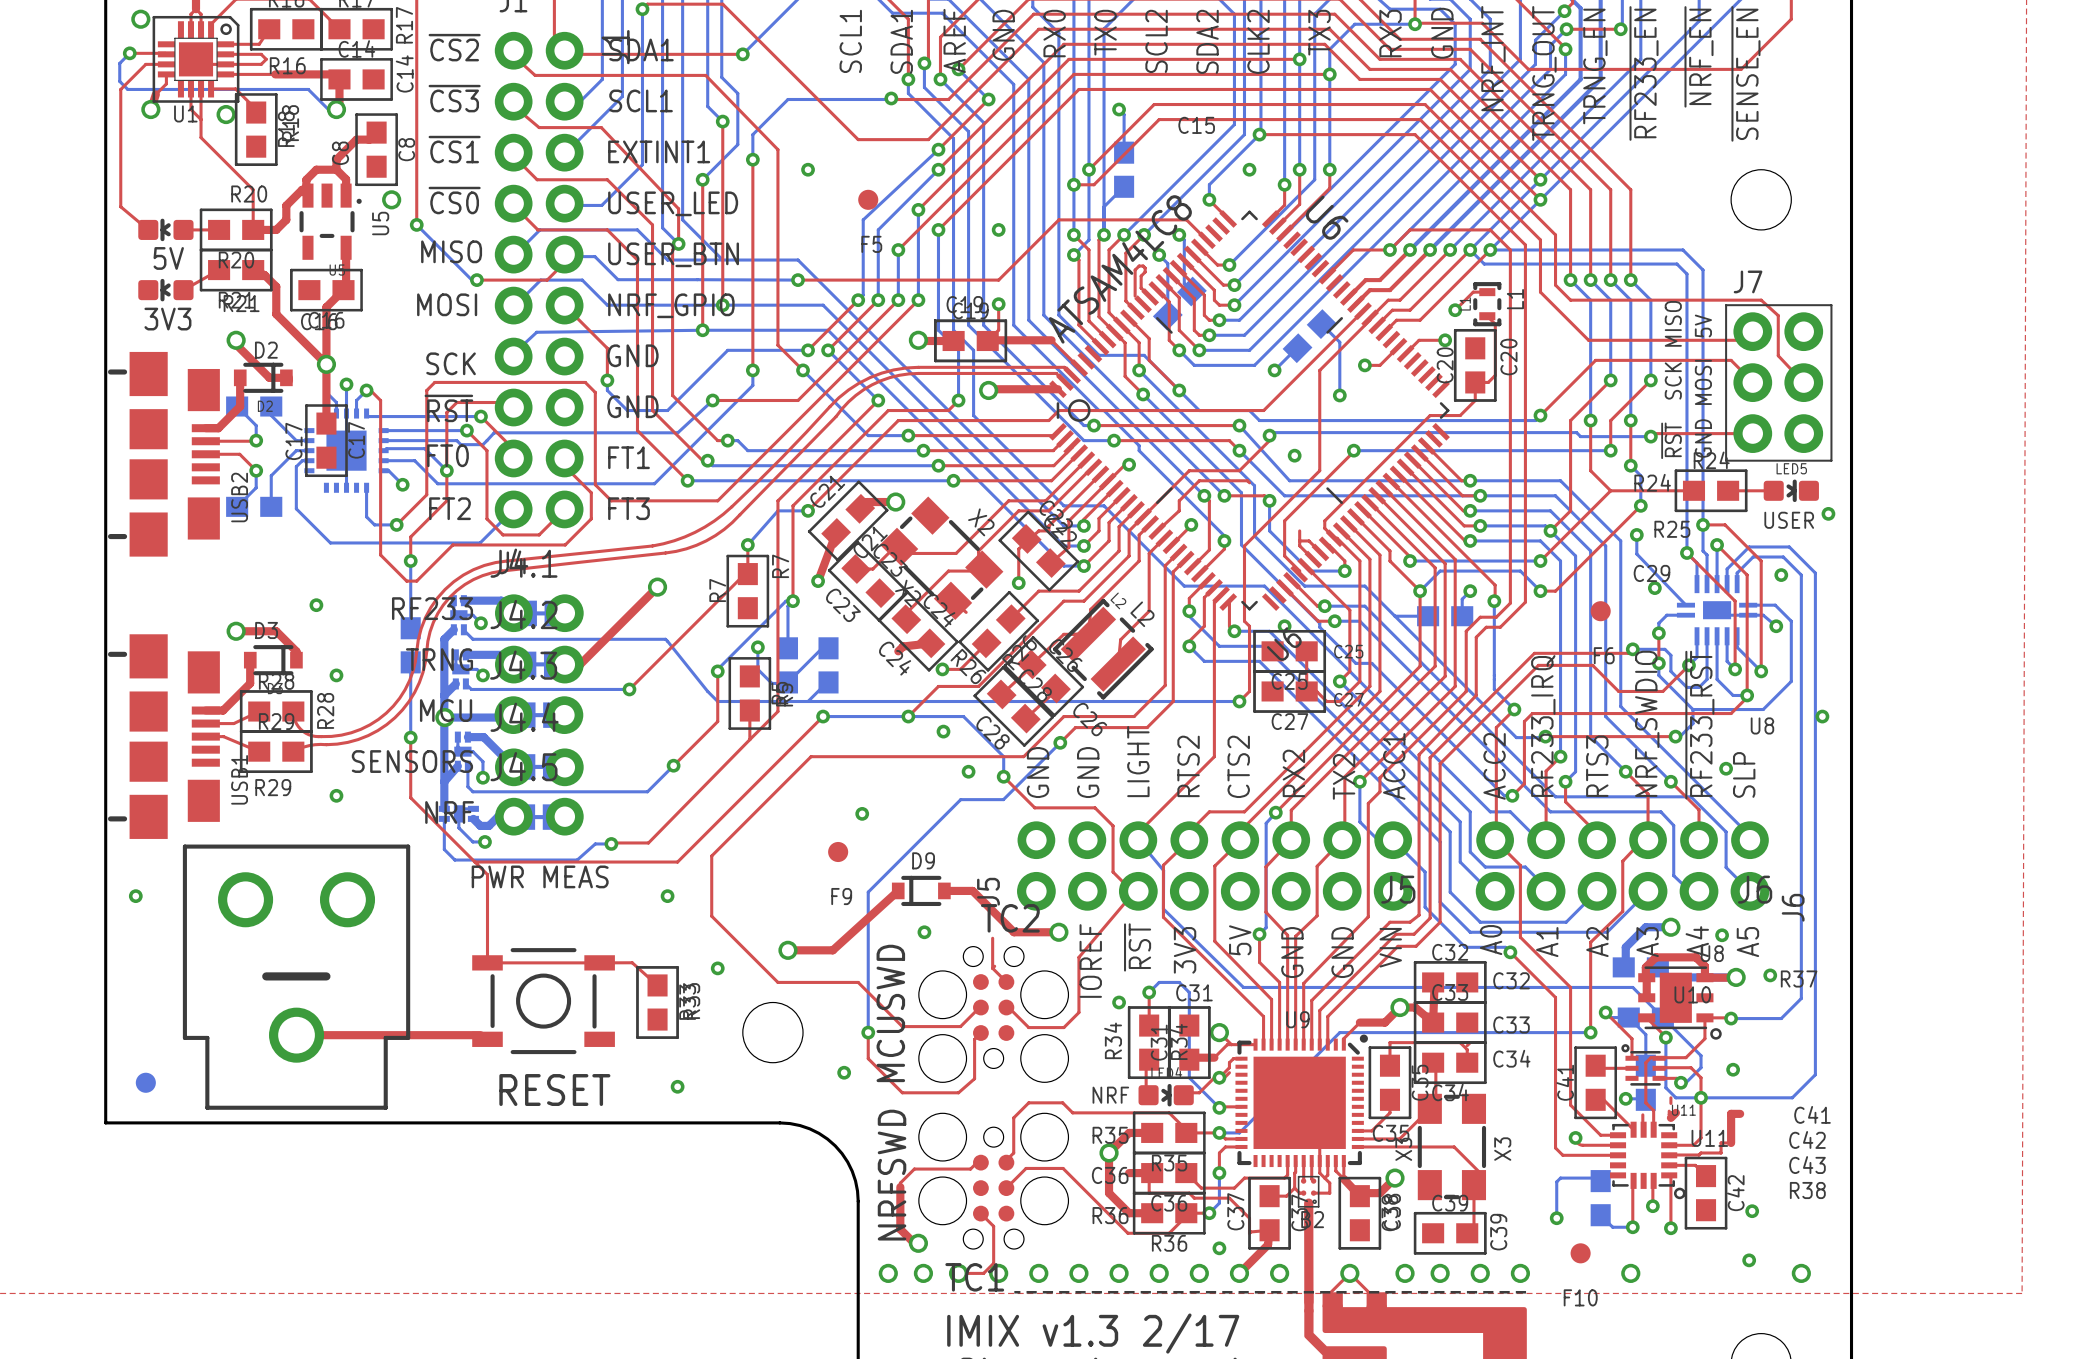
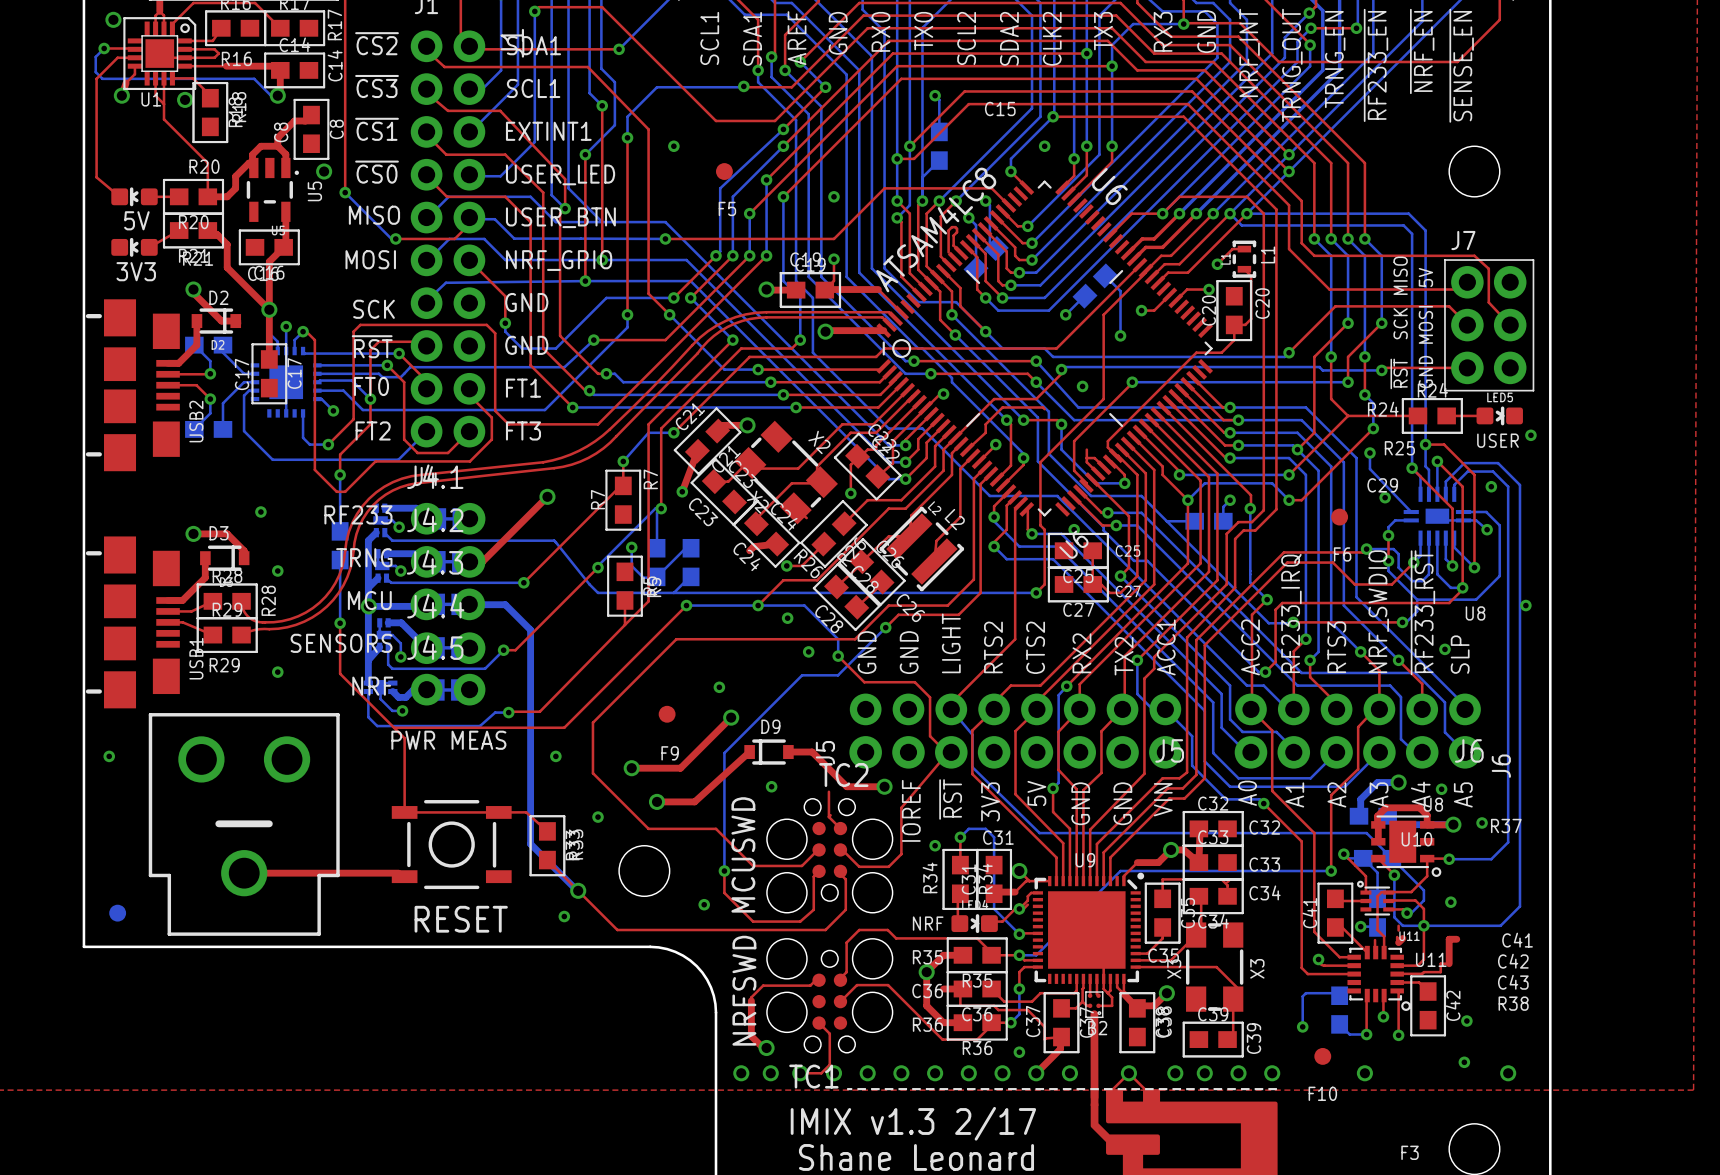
top track: (717, 671) (717, 721) (673, 765) -> (598, 567) (515, 650) (503, 650)
bottom track: none -> (469, 604) (505, 604) (530, 629) (530, 844) (578, 890)
bottom track: (673, 765) (647, 791) (583, 791) -> (503, 650) (485, 668)
via position: (673, 765) -> (503, 650)
top track: none -> (731, 717) (680, 768) (631, 768)
via: none -> (731, 717)
part position: (838, 852) -> (667, 714)
text position: F9 (841, 896) -> F9 (670, 753)
via: none -> (631, 768)
top track: none -> (547, 860) (617, 930) (825, 930) (845, 909) (845, 879) (840, 874) (840, 871)
via: none -> (578, 890)

